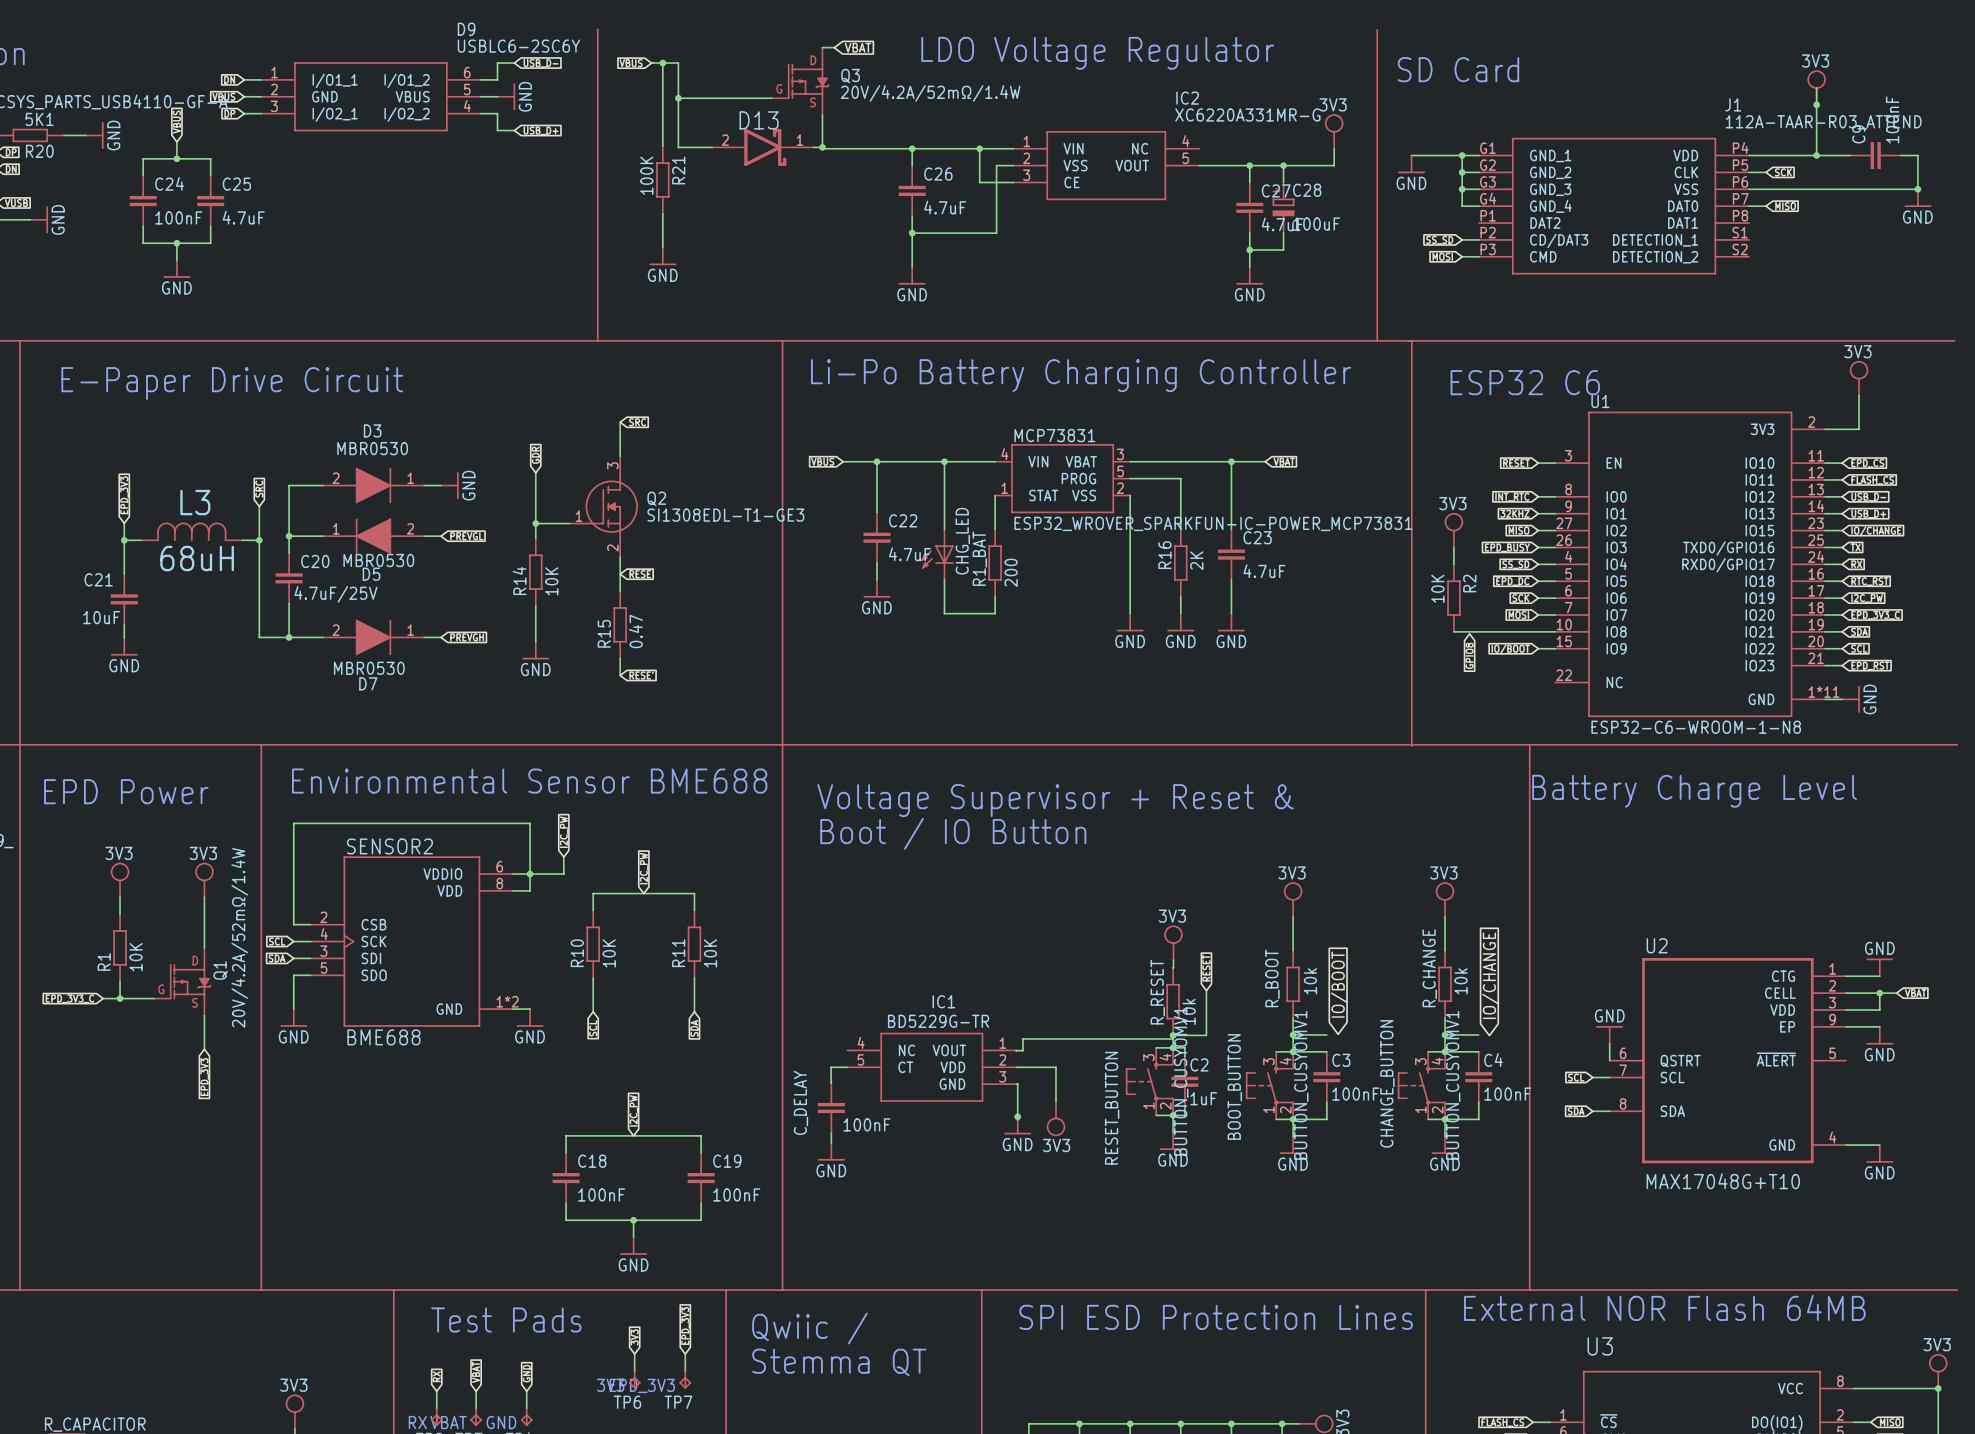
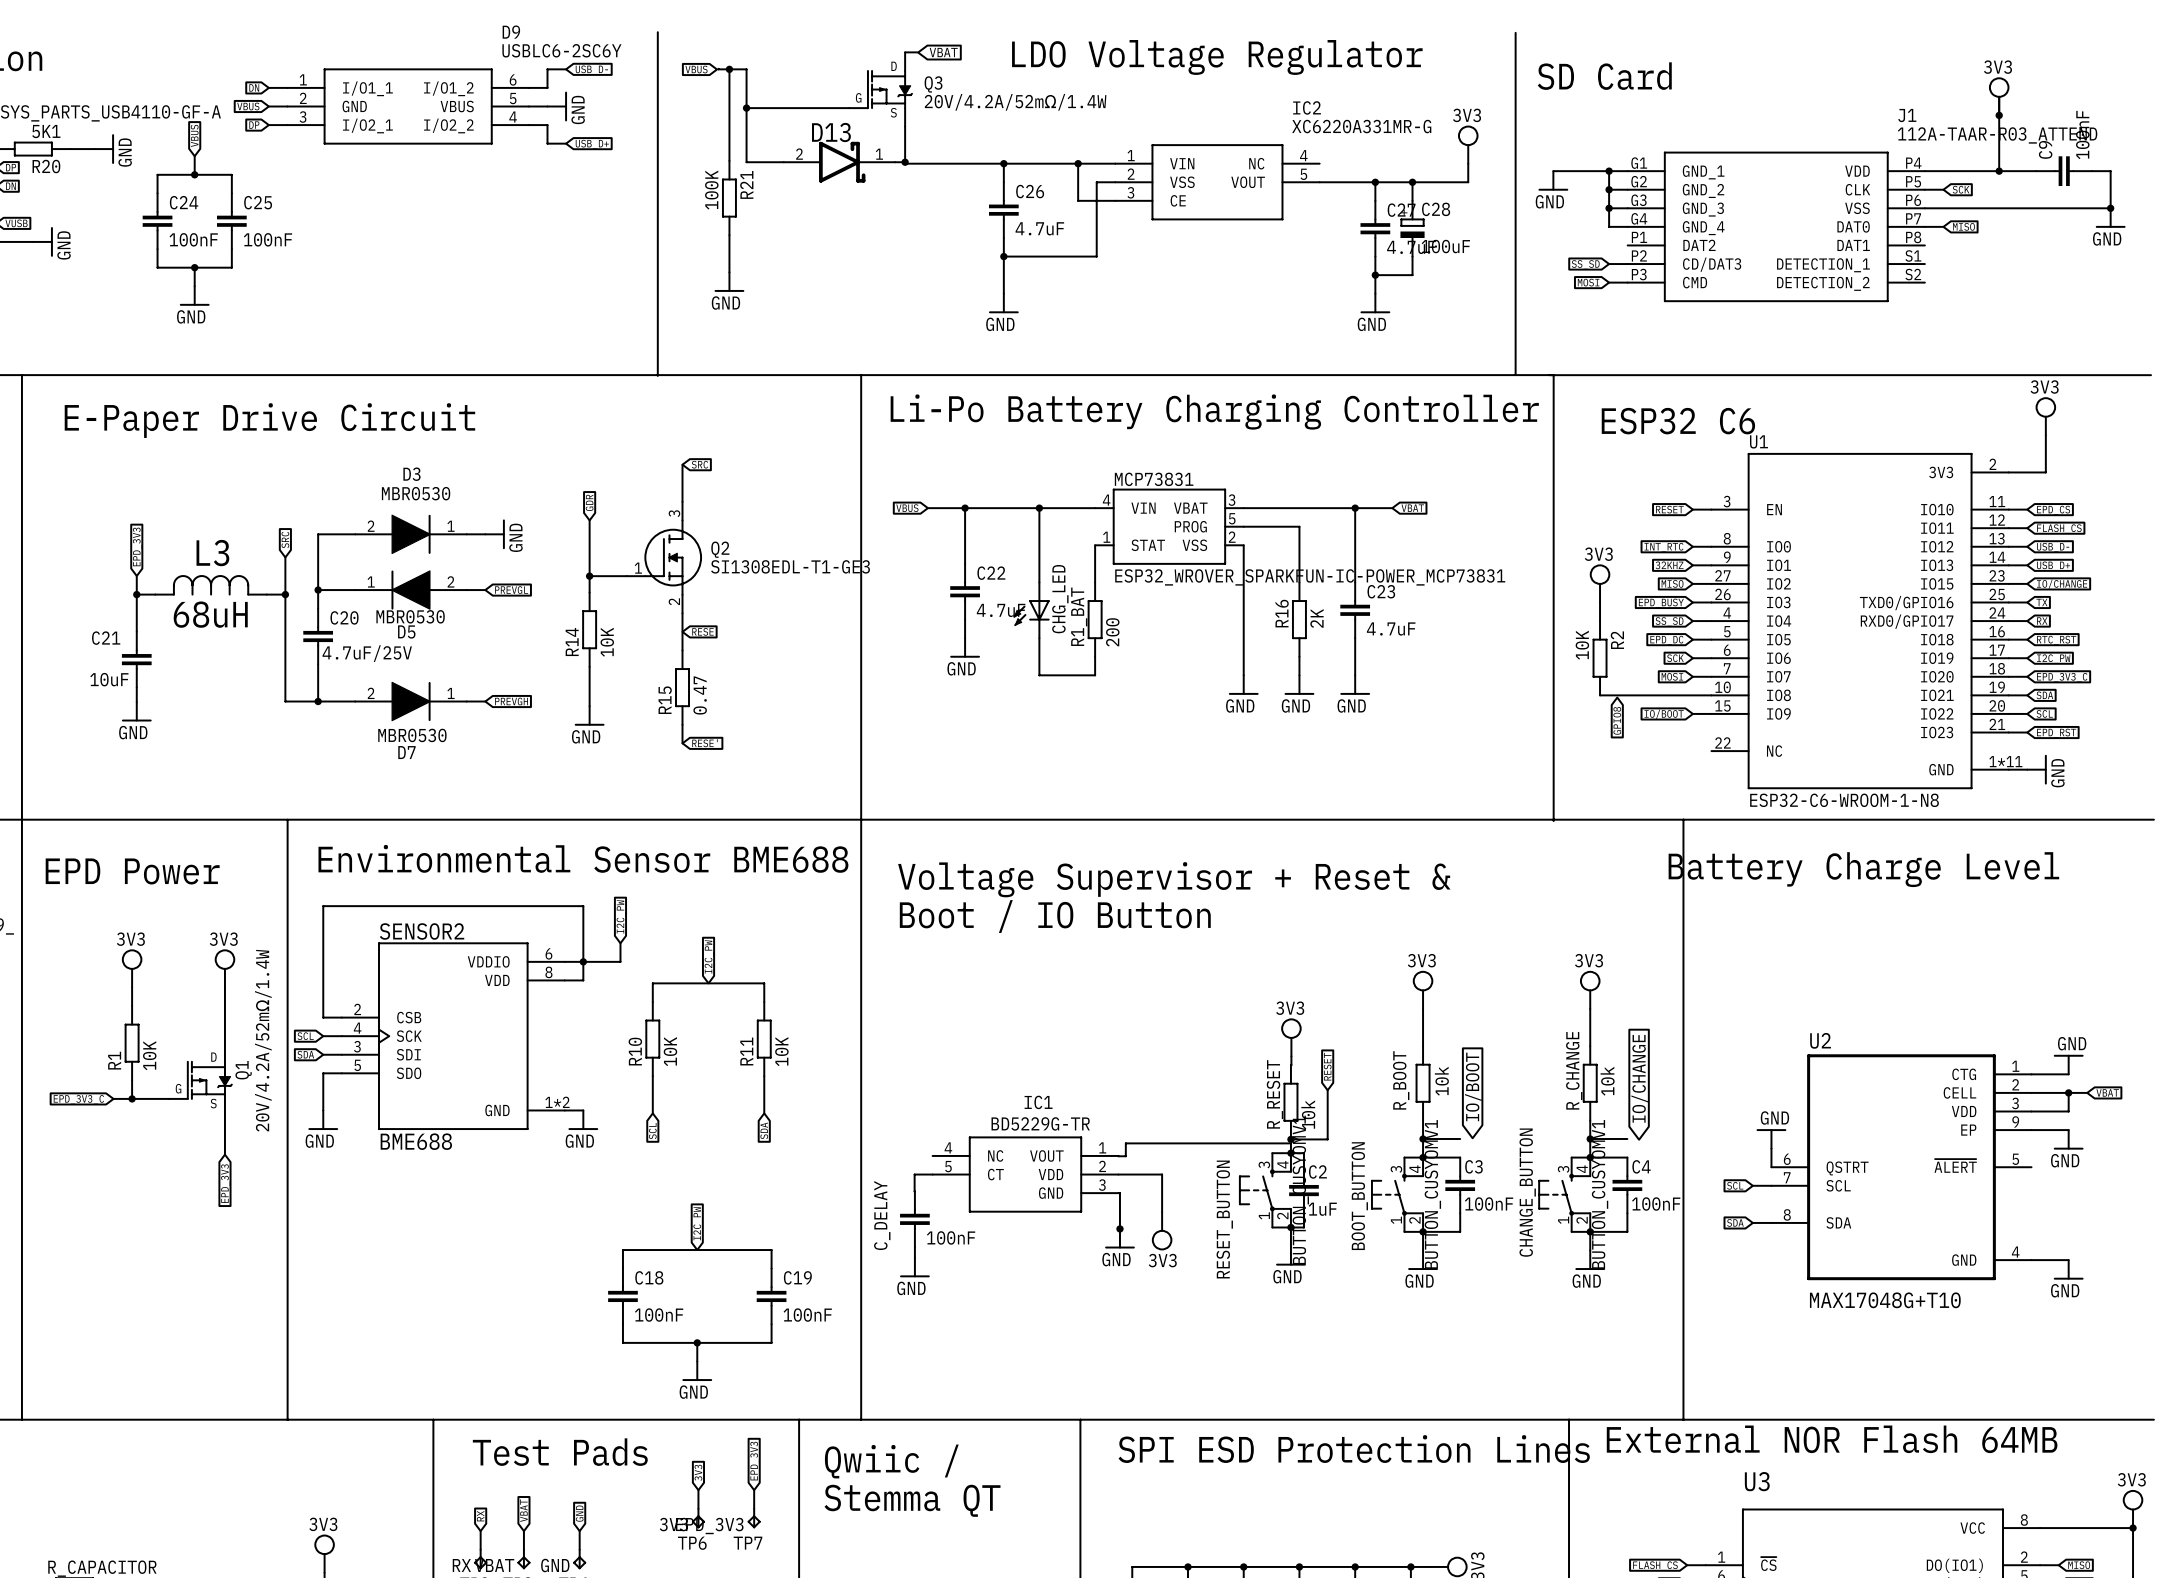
C25 value: 4.7uF (243, 217) -> 100nF (268, 239)

